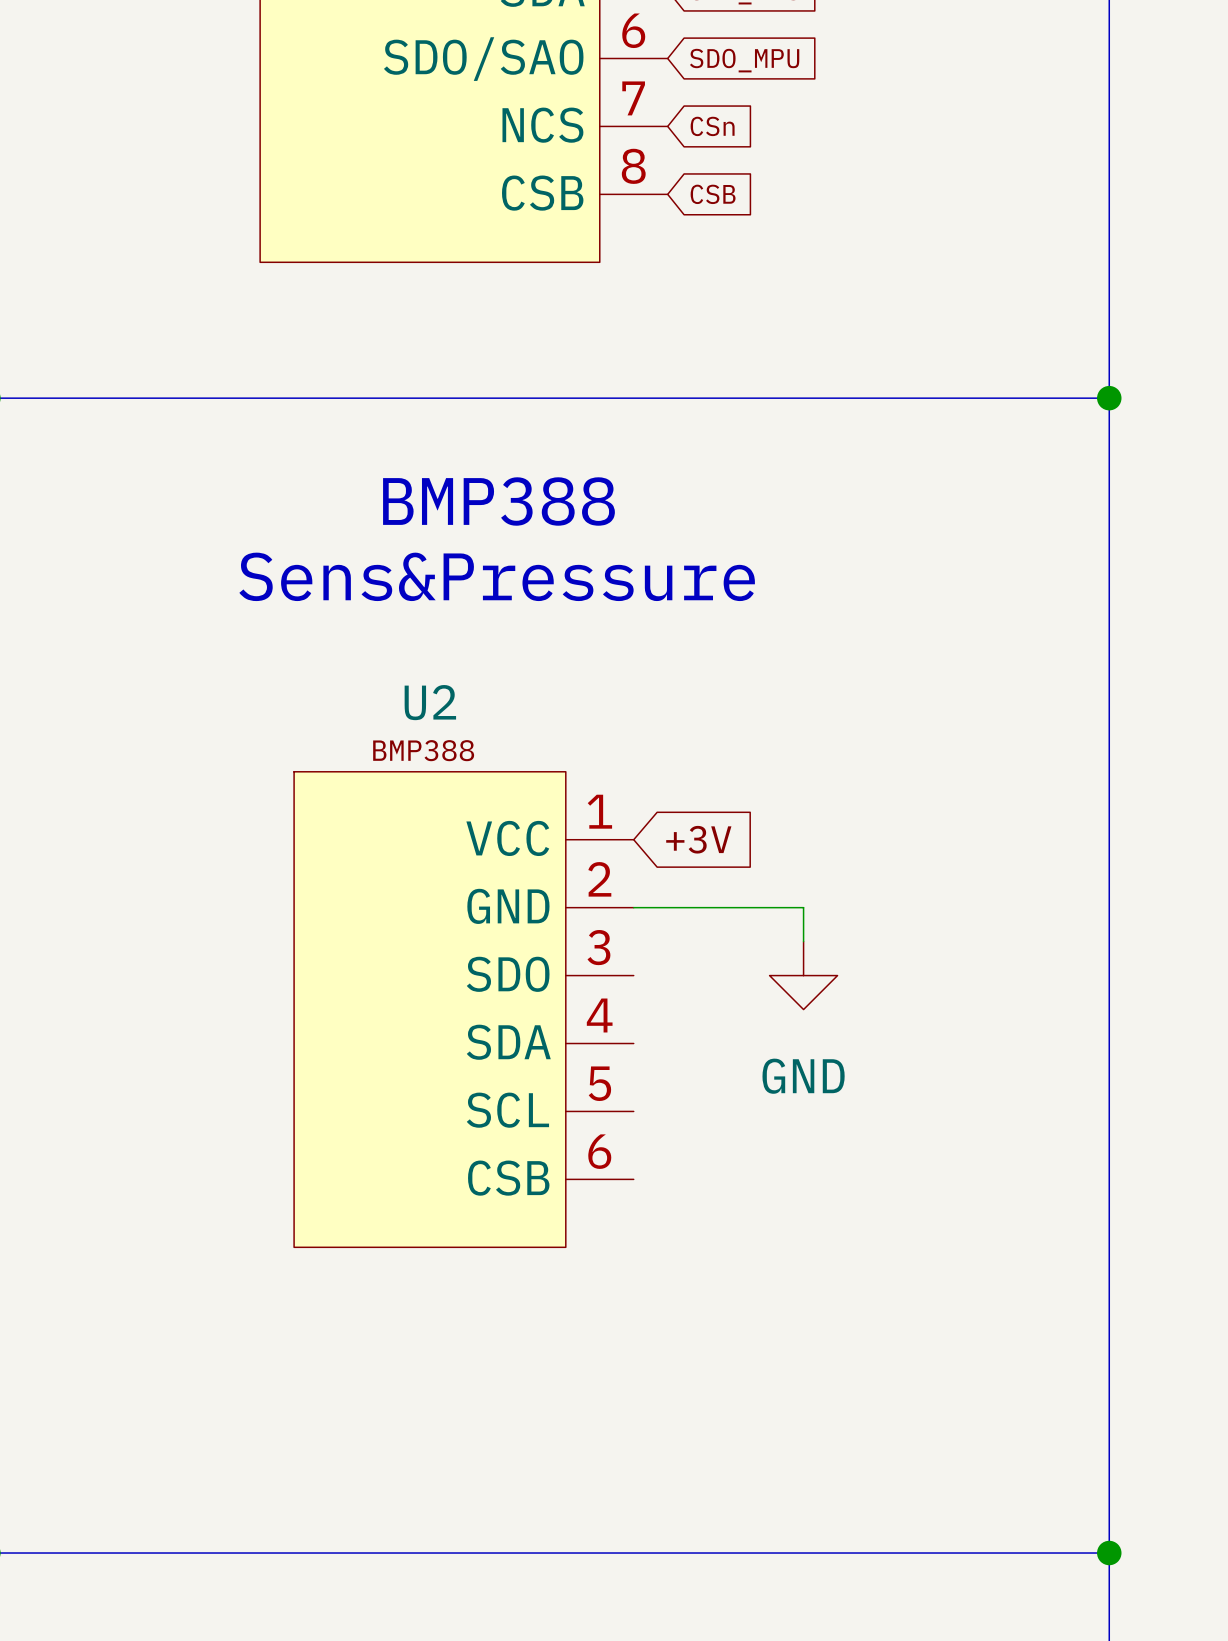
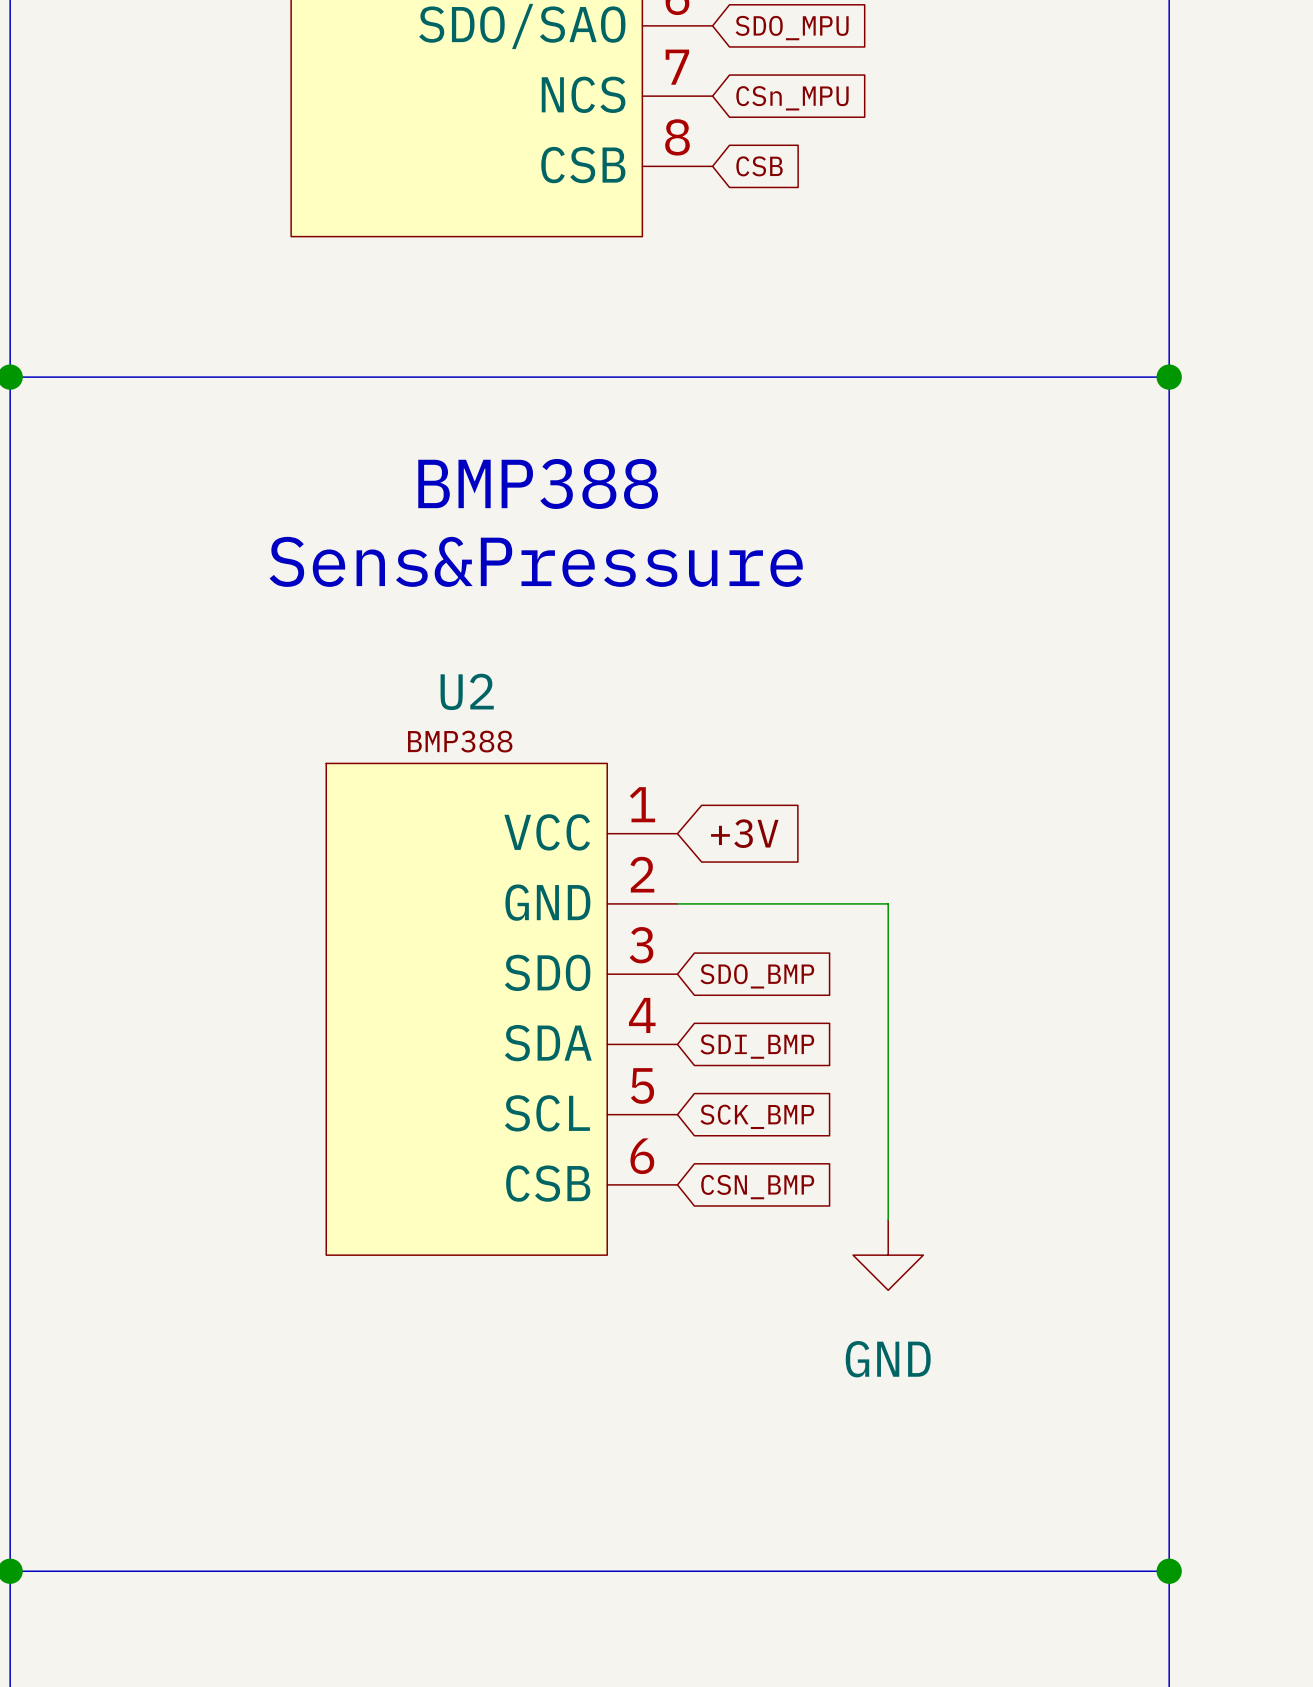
global label: CSn (712, 126) -> CSn_MPU (792, 98)
wire: (803, 907) (803, 941) -> (853, 903) (888, 903) (888, 1220)
power symbol position: GND (803, 975) -> GND (888, 1255)
global label: none -> SDO_BMP (757, 976)
global label: none -> SDI_BMP (757, 1046)
global label: none -> SCK_BMP (757, 1116)
global label: none -> CSN_BMP (757, 1187)

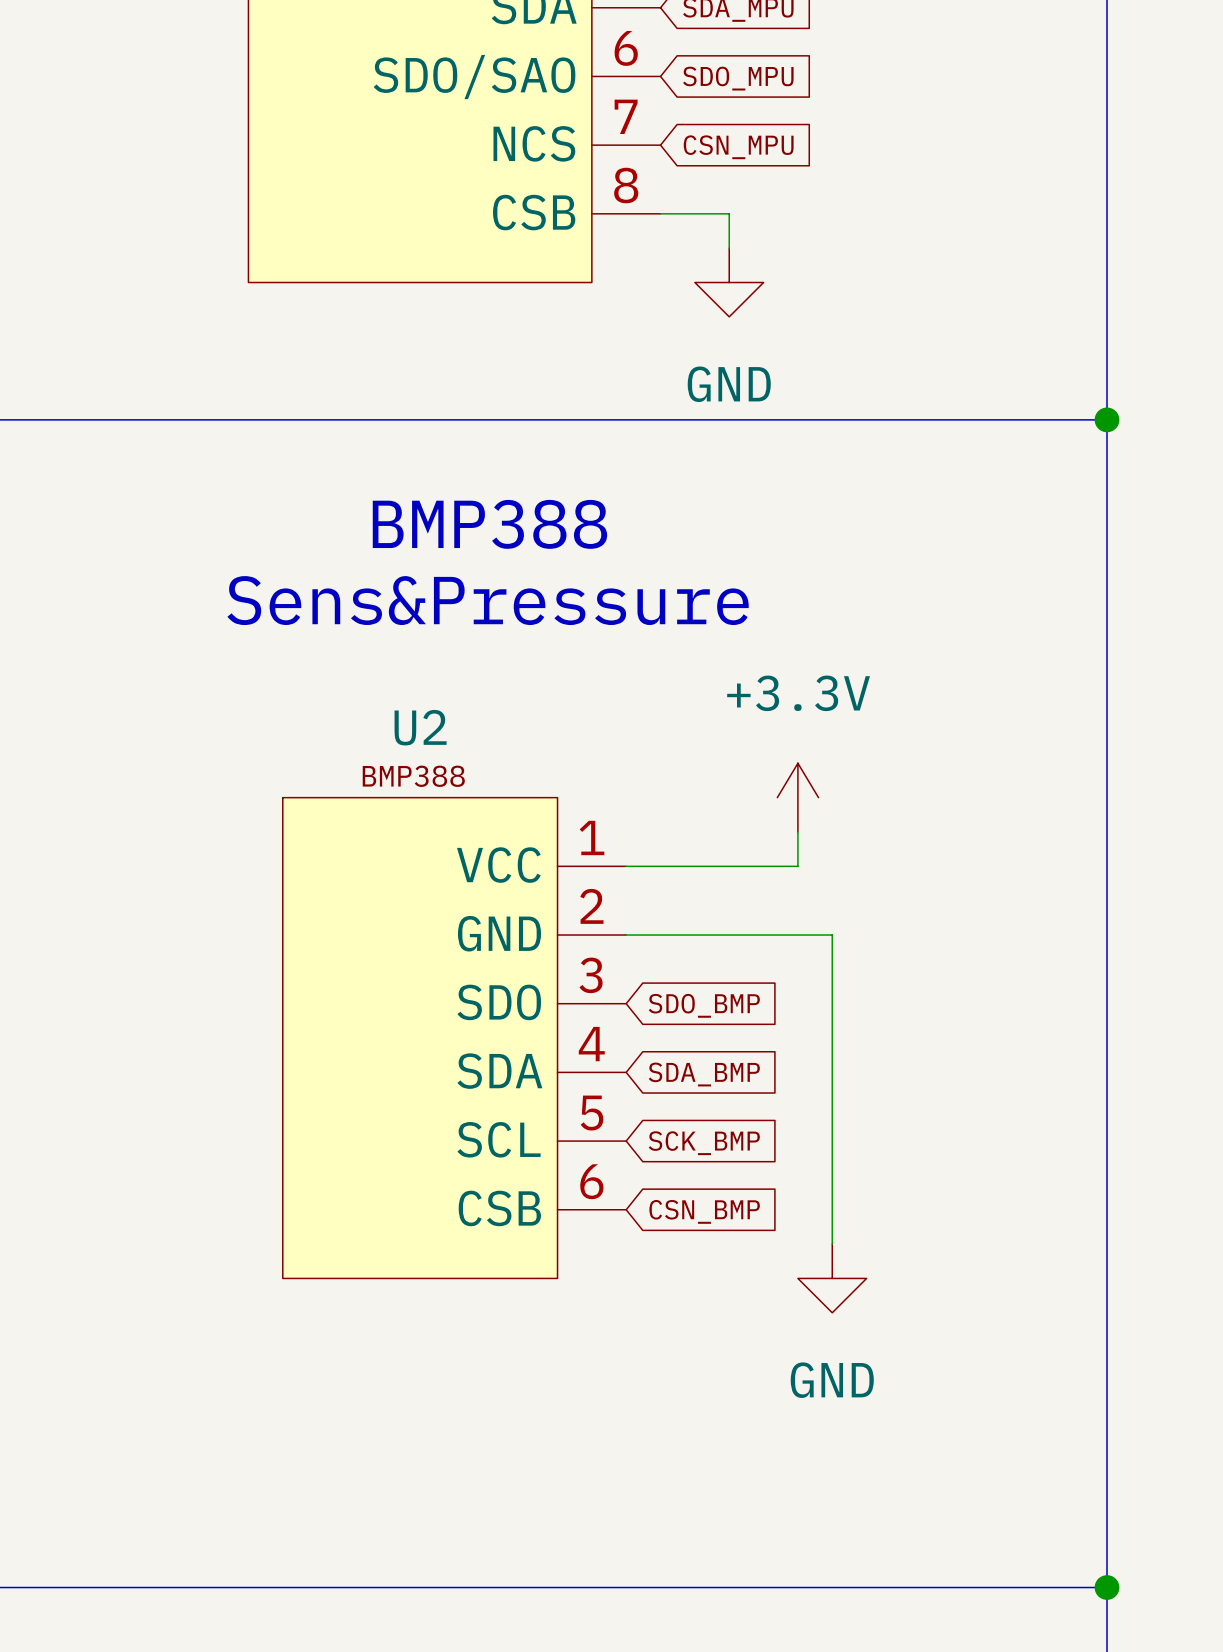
global label: CSn_MPU (792, 98) -> CSN_MPU (738, 147)
wire: none -> (660, 213) (729, 213) (729, 248)
global label: CSB (759, 166) -> none
power symbol: none -> GND (729, 282)
power symbol: none -> +3.3V (797, 797)
wire: none -> (797, 831) (797, 866) (626, 866)
global label: +3V (744, 833) -> none
global label: SDI_BMP (757, 1046) -> SDA_BMP (704, 1074)

